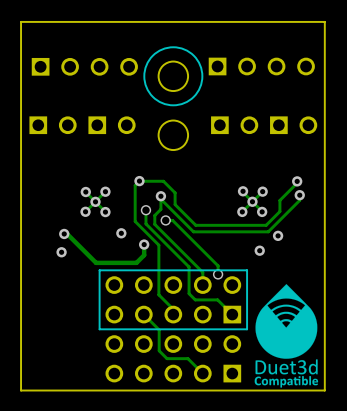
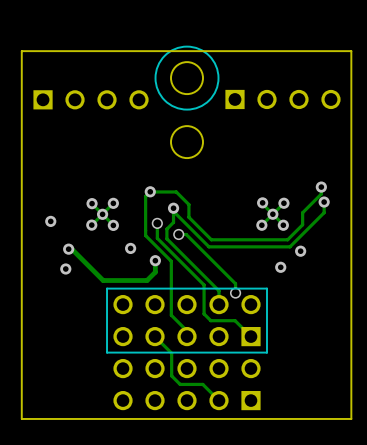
board edge: (324, 51) (324, 21) (21, 21) (21, 51) -> (351, 51) (21, 51)
part position: (84, 66) -> (91, 99)
part position: (261, 66) -> (282, 99)
part: (53, 125) -> none
part: (112, 125) -> none
part: (234, 125) -> none
part: (293, 125) -> none
via: none -> (321, 187)
via: (297, 181) -> none
via: none -> (324, 202)
via: (299, 195) -> none
via: none -> (50, 221)
drawing: [254, 284, 319, 388] -> none

